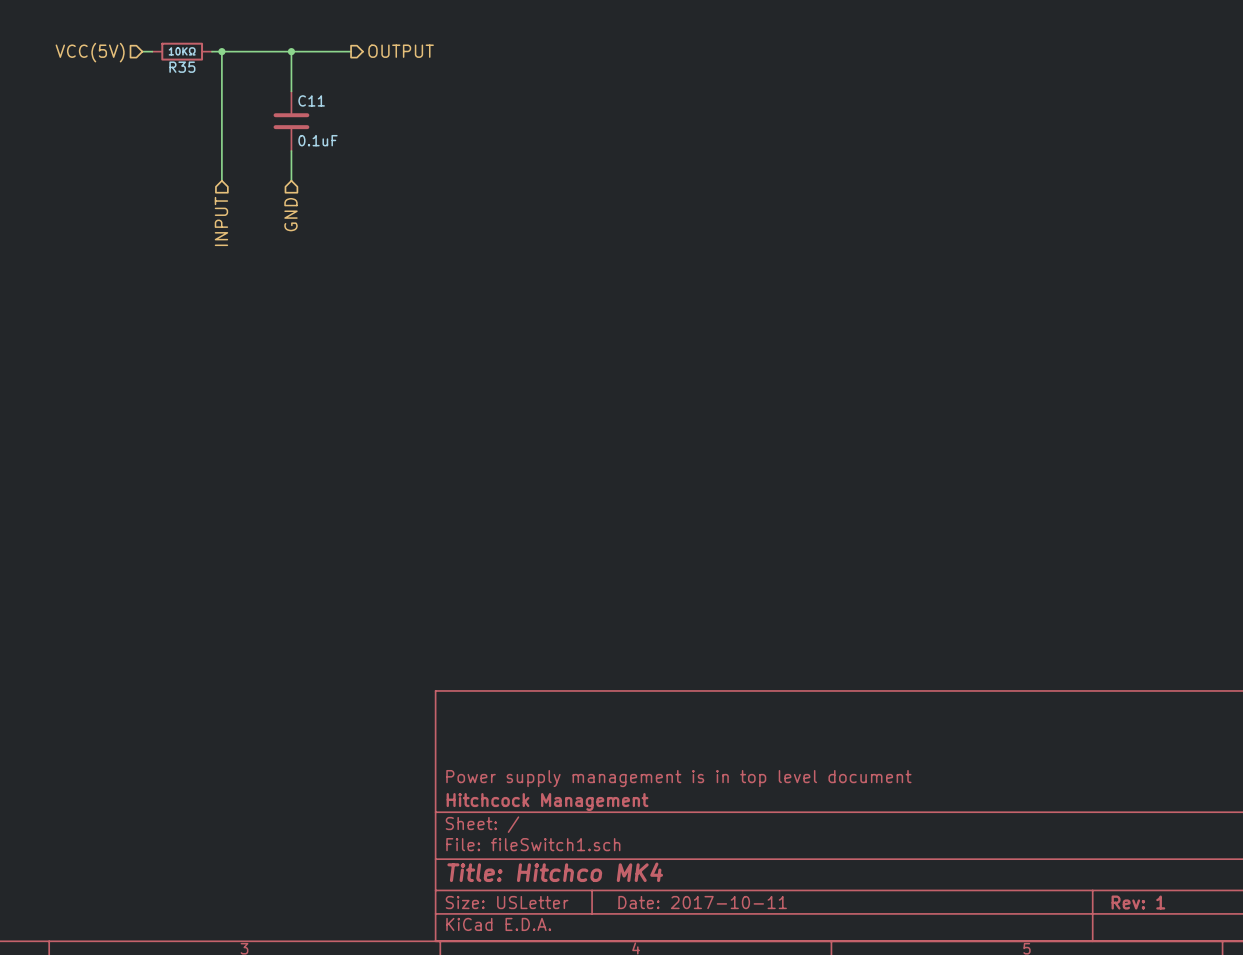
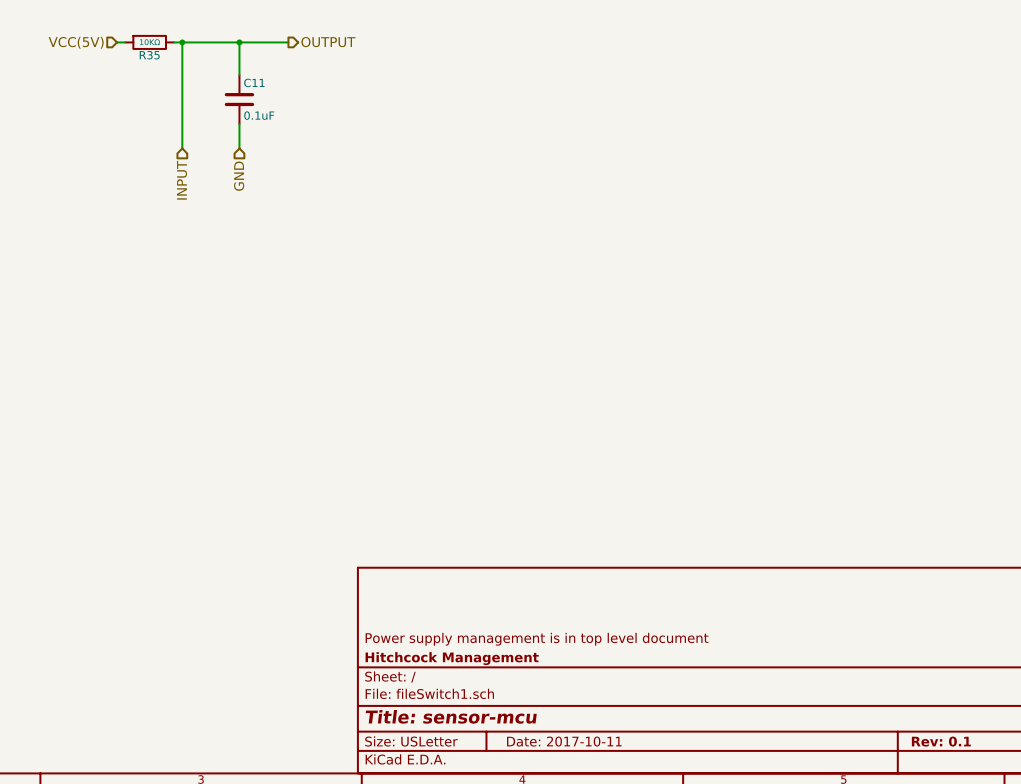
title block: Title: Hitchco MK4 (555, 872) -> Title: sensor-mcu (451, 716)
title block: Rev: 1 (1138, 902) -> Rev: 0.1 (941, 741)

